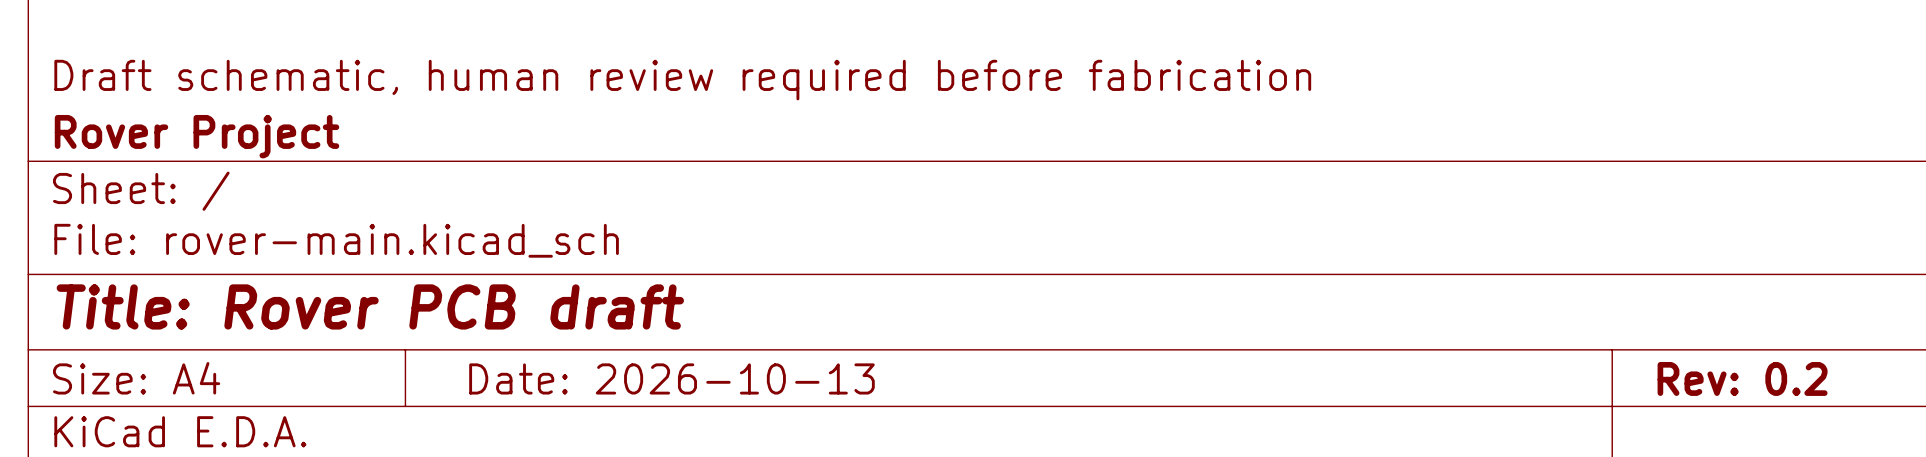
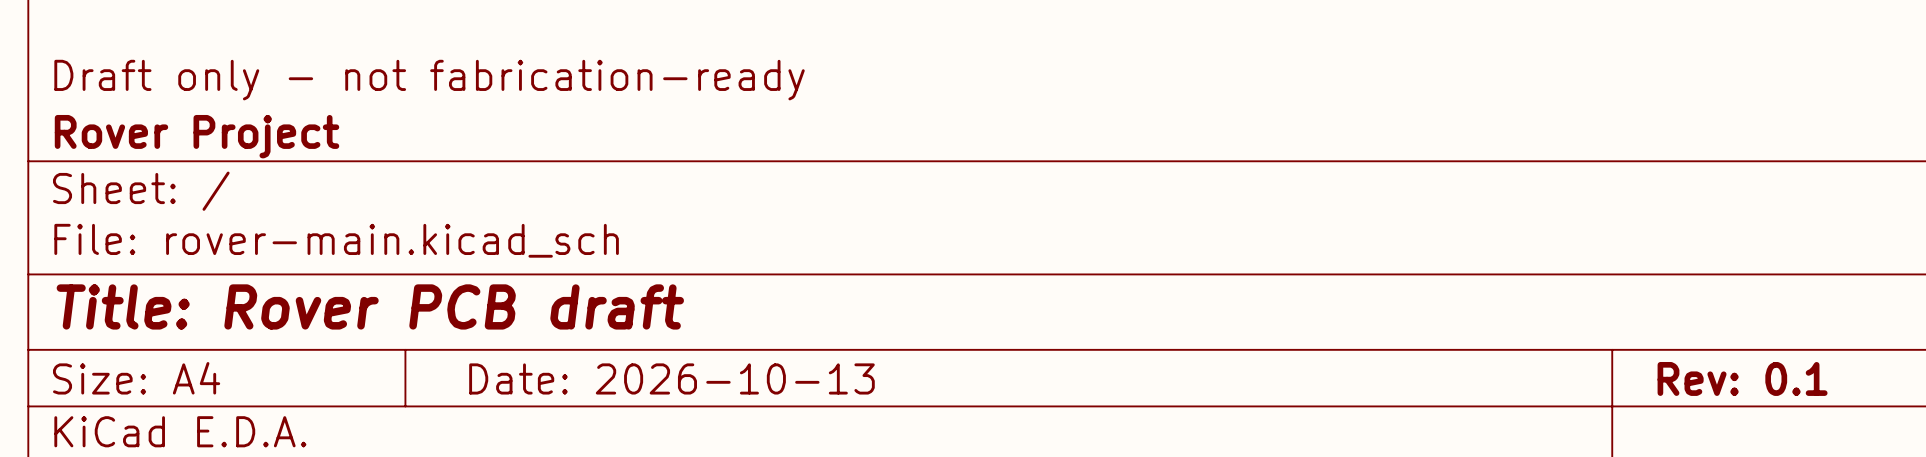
title block: Draft schematic, human review required before fabrication (682, 80) -> Draft only - not fabrication-ready (429, 80)
title block: Rev: 0.2 (1742, 378) -> Rev: 0.1 (1742, 378)

